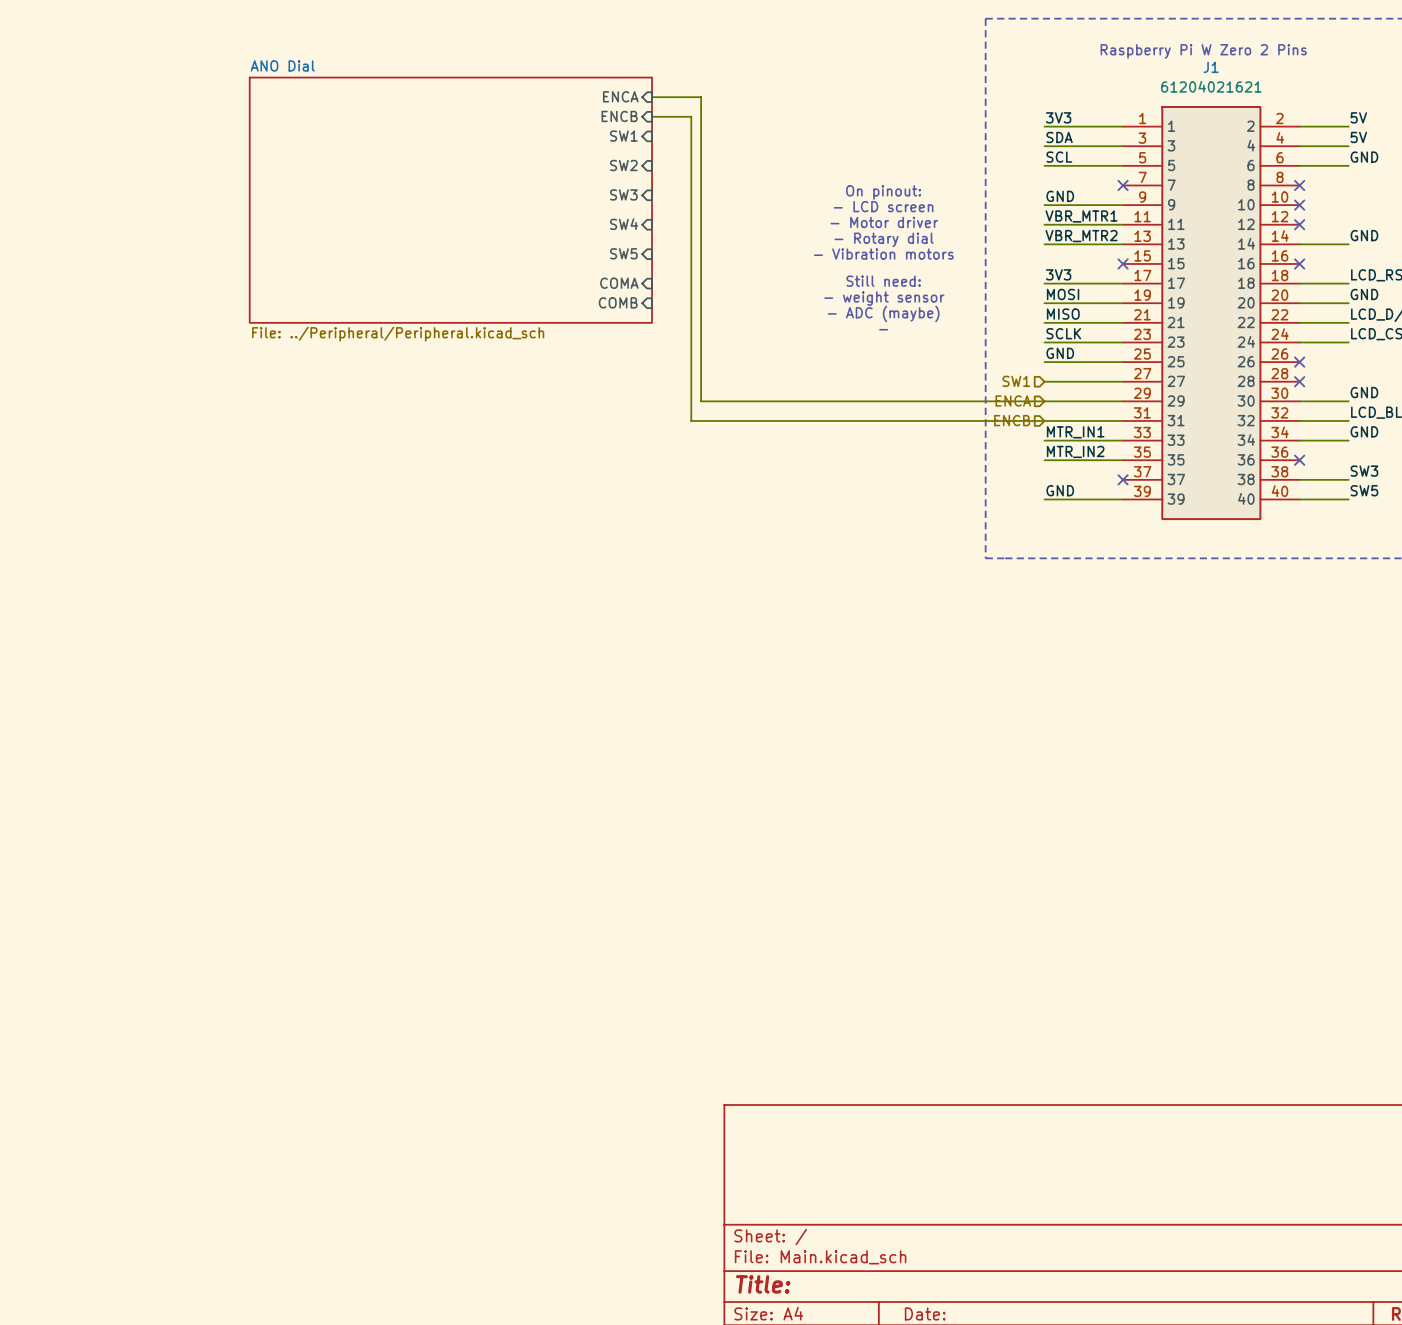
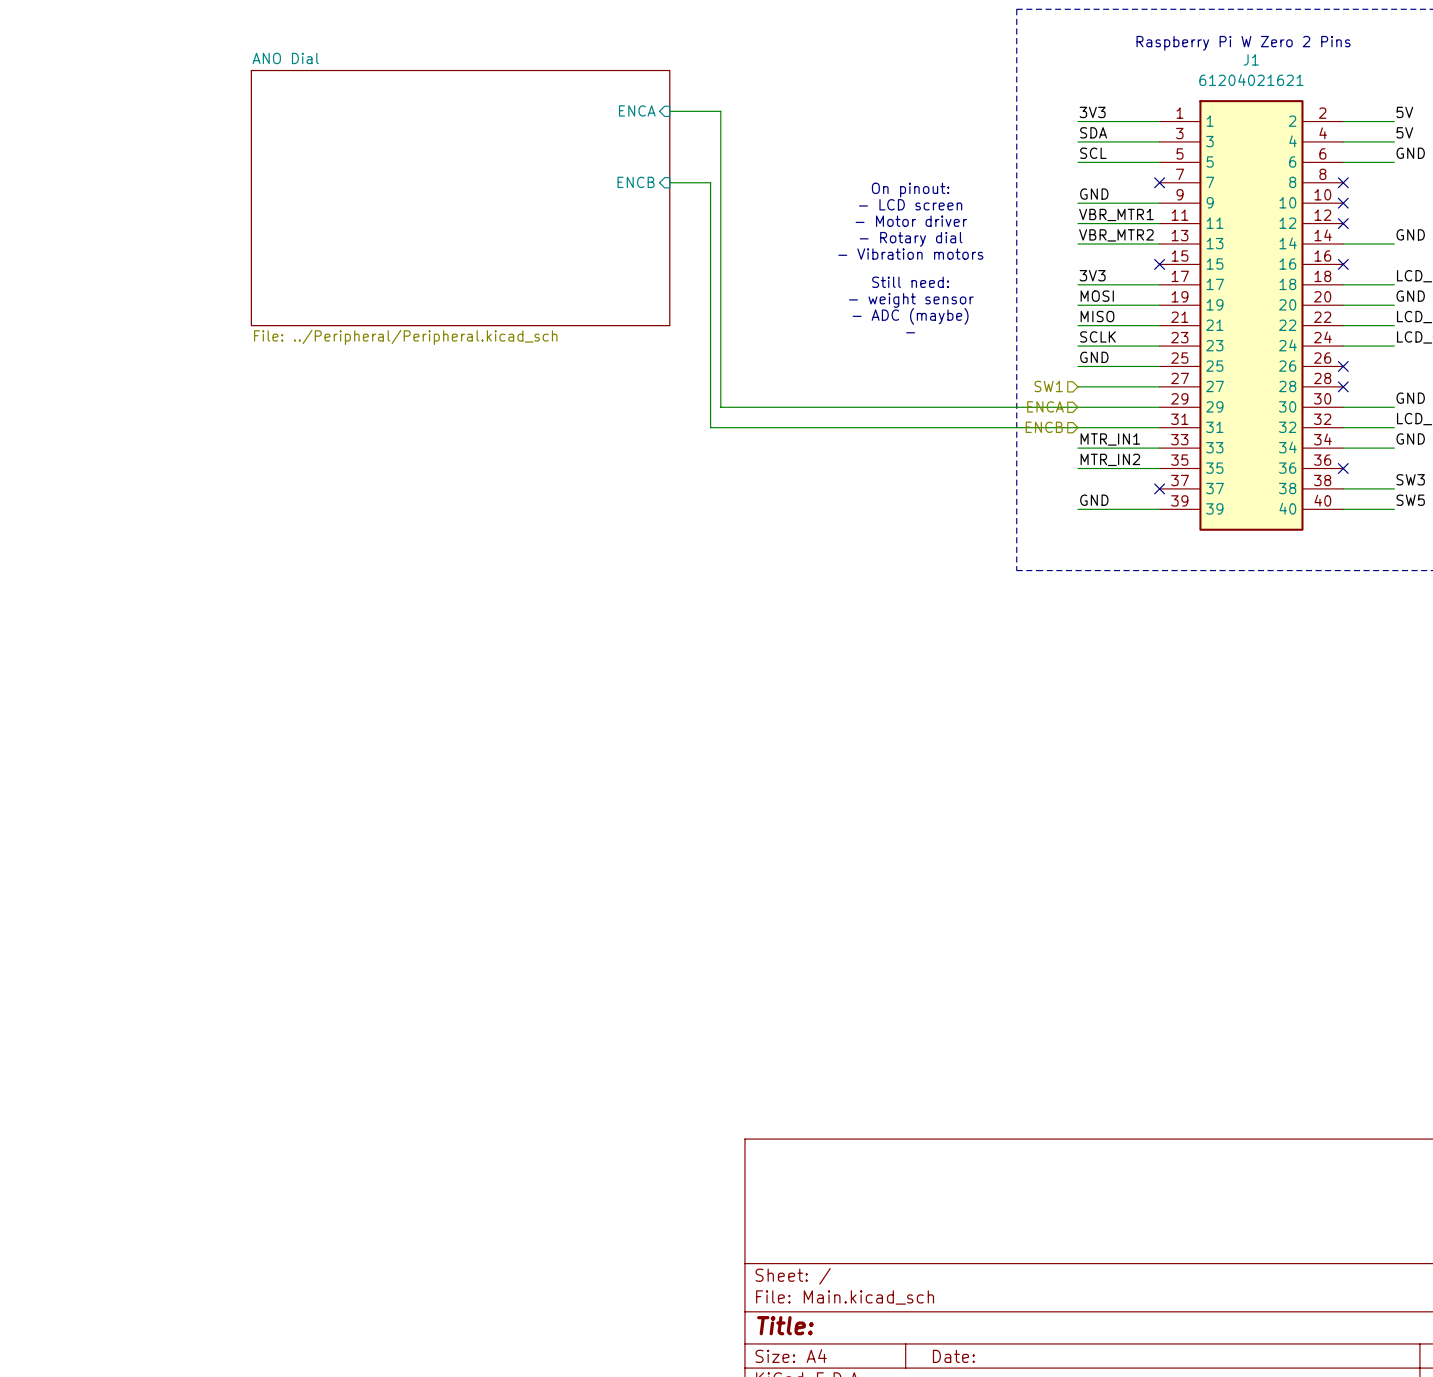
sheet pin: ENCA (620, 96) -> none
wire: (652, 97) (701, 97) (701, 116) -> (710, 111) (720, 111)
sheet pin: ENCB (619, 116) -> ENCA (637, 110)
wire: (691, 116) (691, 185) -> (669, 182) (710, 182)
sheet pin: SW1 (623, 136) -> none
sheet pin: SW2 (623, 165) -> none
sheet pin: none -> ENCB (636, 182)
sheet pin: SW3 (623, 194) -> none
sheet pin: SW4 (624, 224) -> none
sheet pin: SW5 (623, 253) -> none
sheet pin: COMA (619, 283) -> none
sheet pin: COMB (618, 302) -> none

